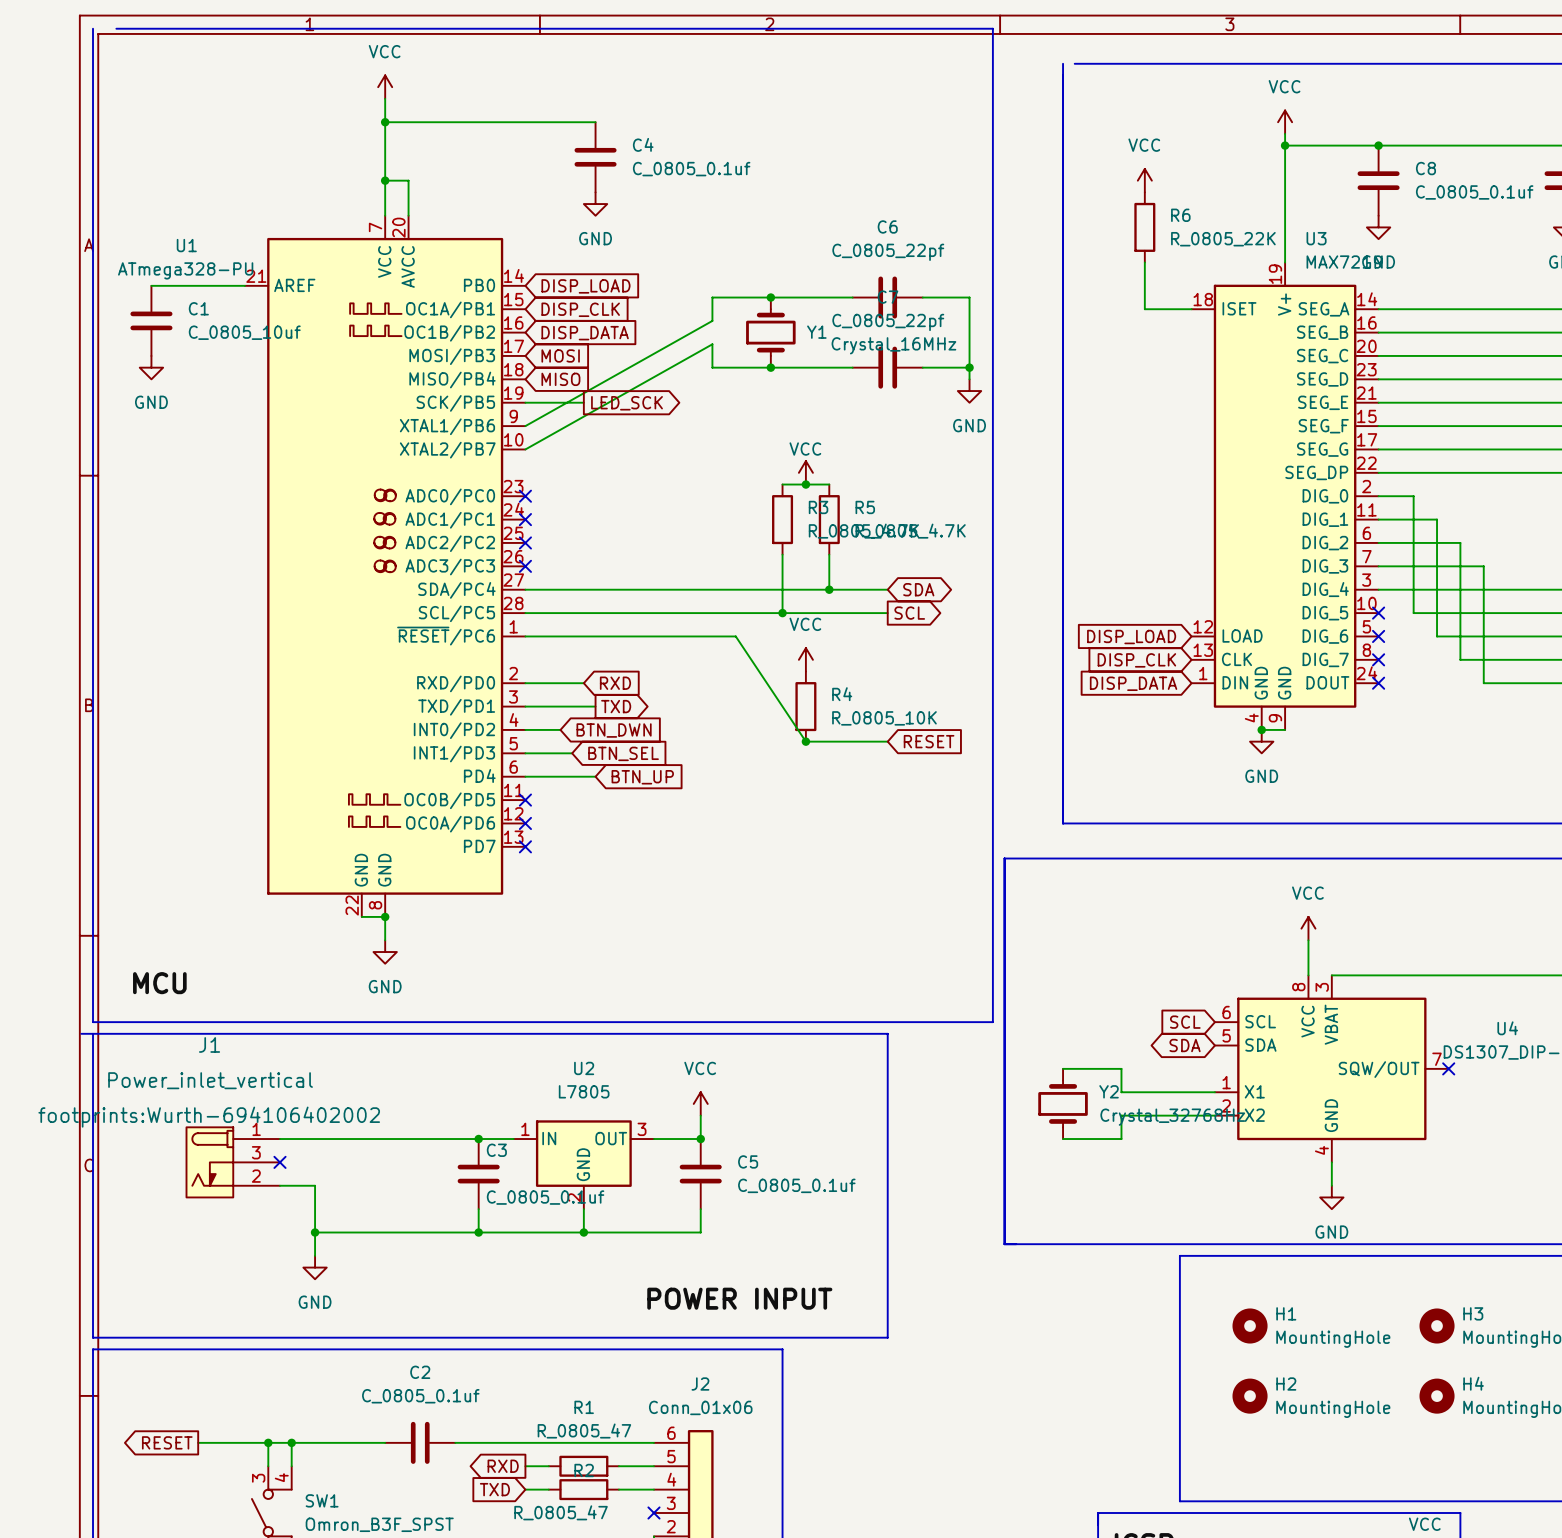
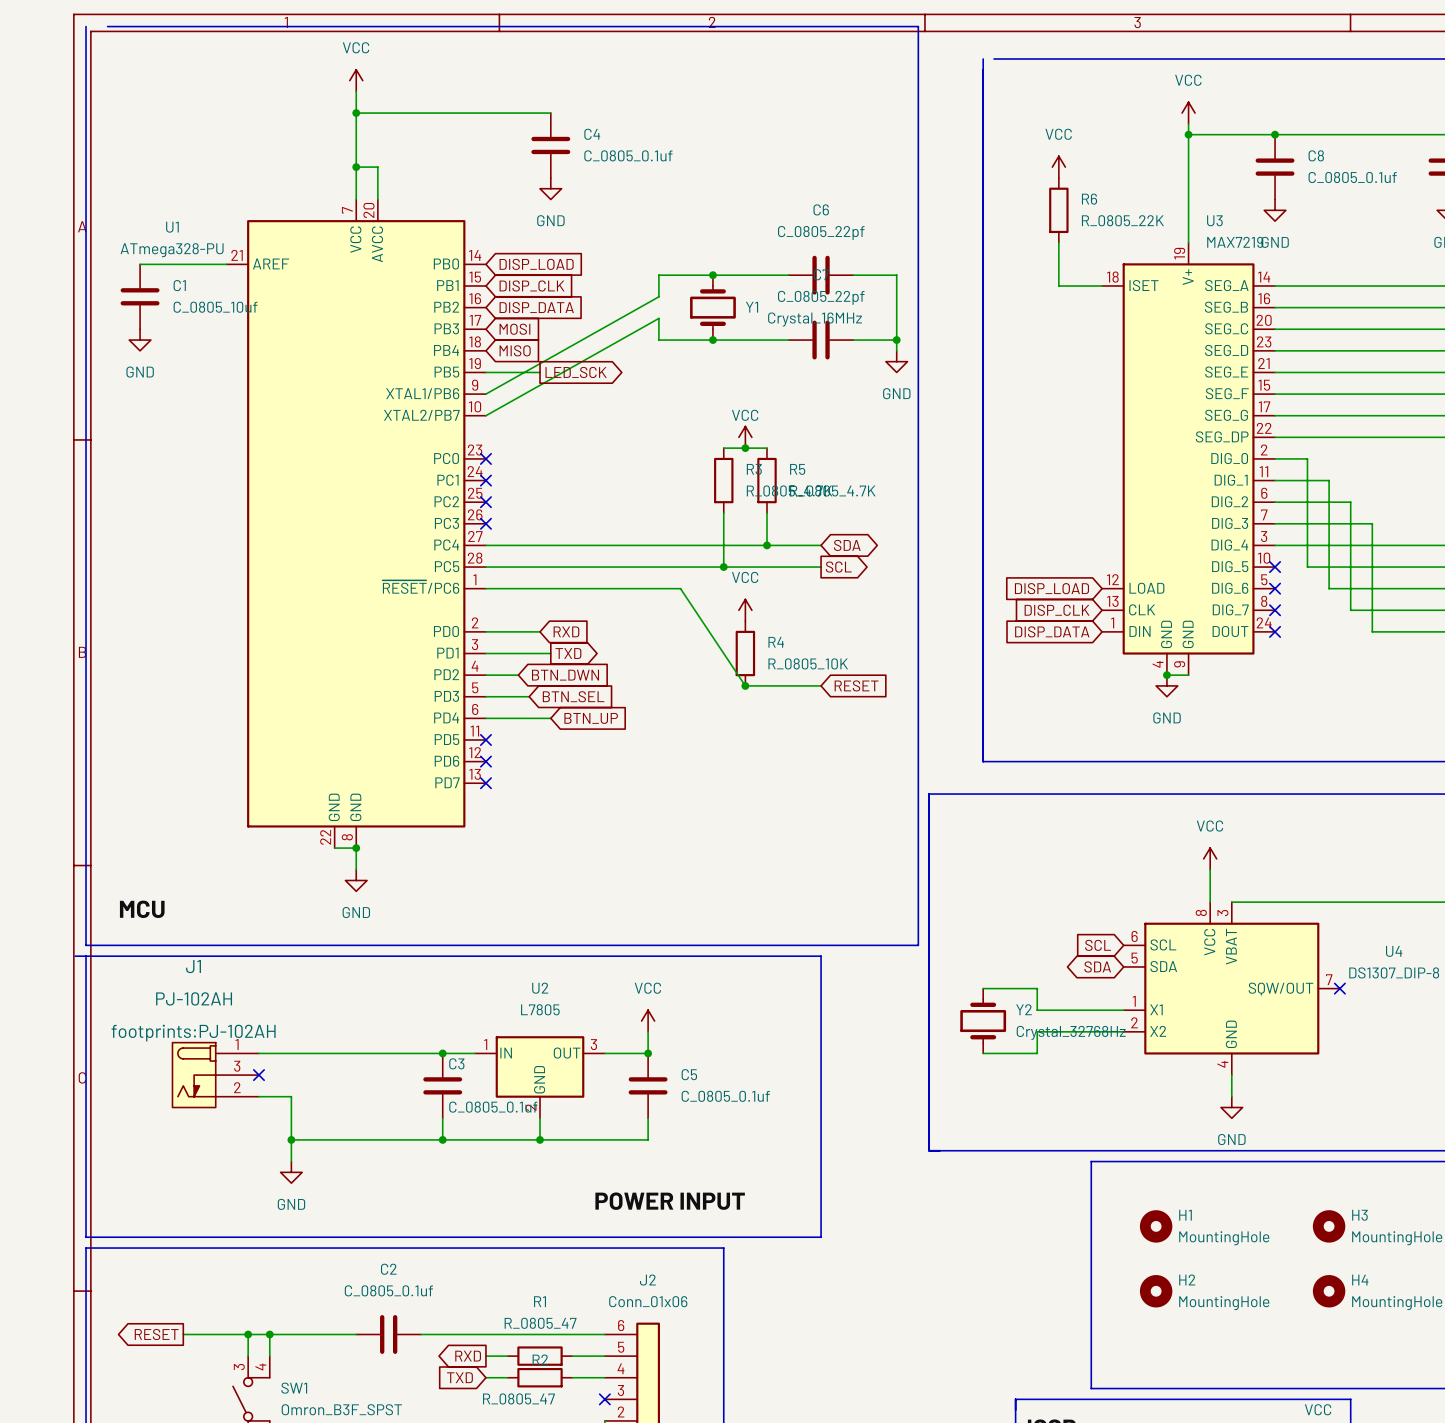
U1 symbol: [244, 215, 526, 917] -> [226, 199, 486, 849]
J1 value: Power_inlet_vertical (210, 1080) -> PJ-102AH (194, 998)
J1 text: footprints:Wurth-694106402002 (209, 1117) -> footprints:PJ-102AH (193, 1033)

